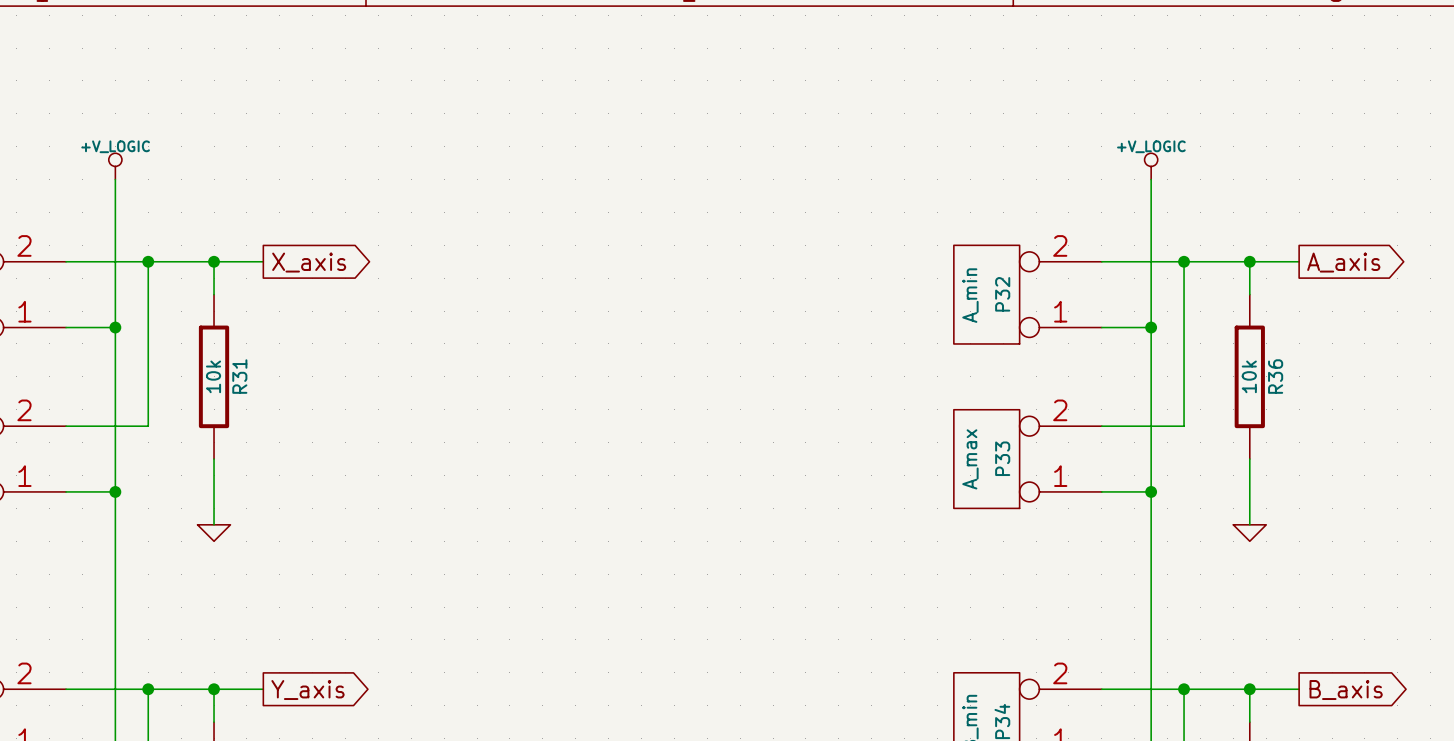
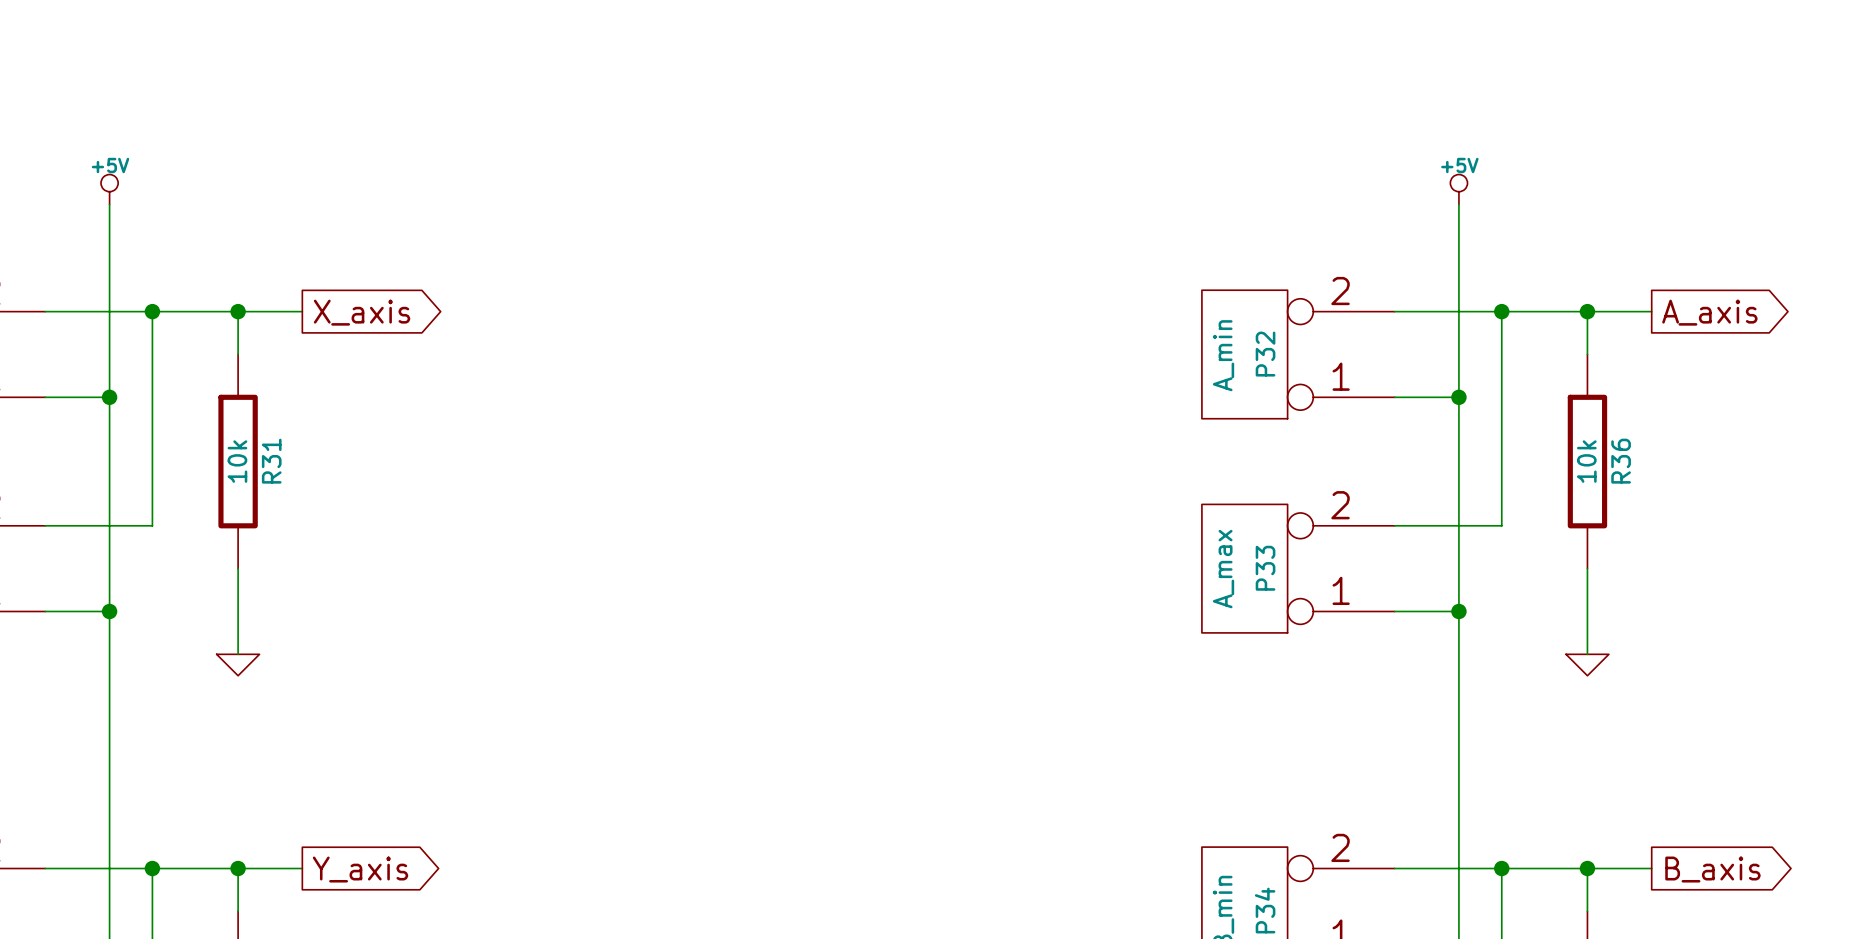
power symbol: +V_LOGIC (115, 166) -> +5V (109, 189)
power symbol: +V_LOGIC (1151, 166) -> +5V (1458, 189)

